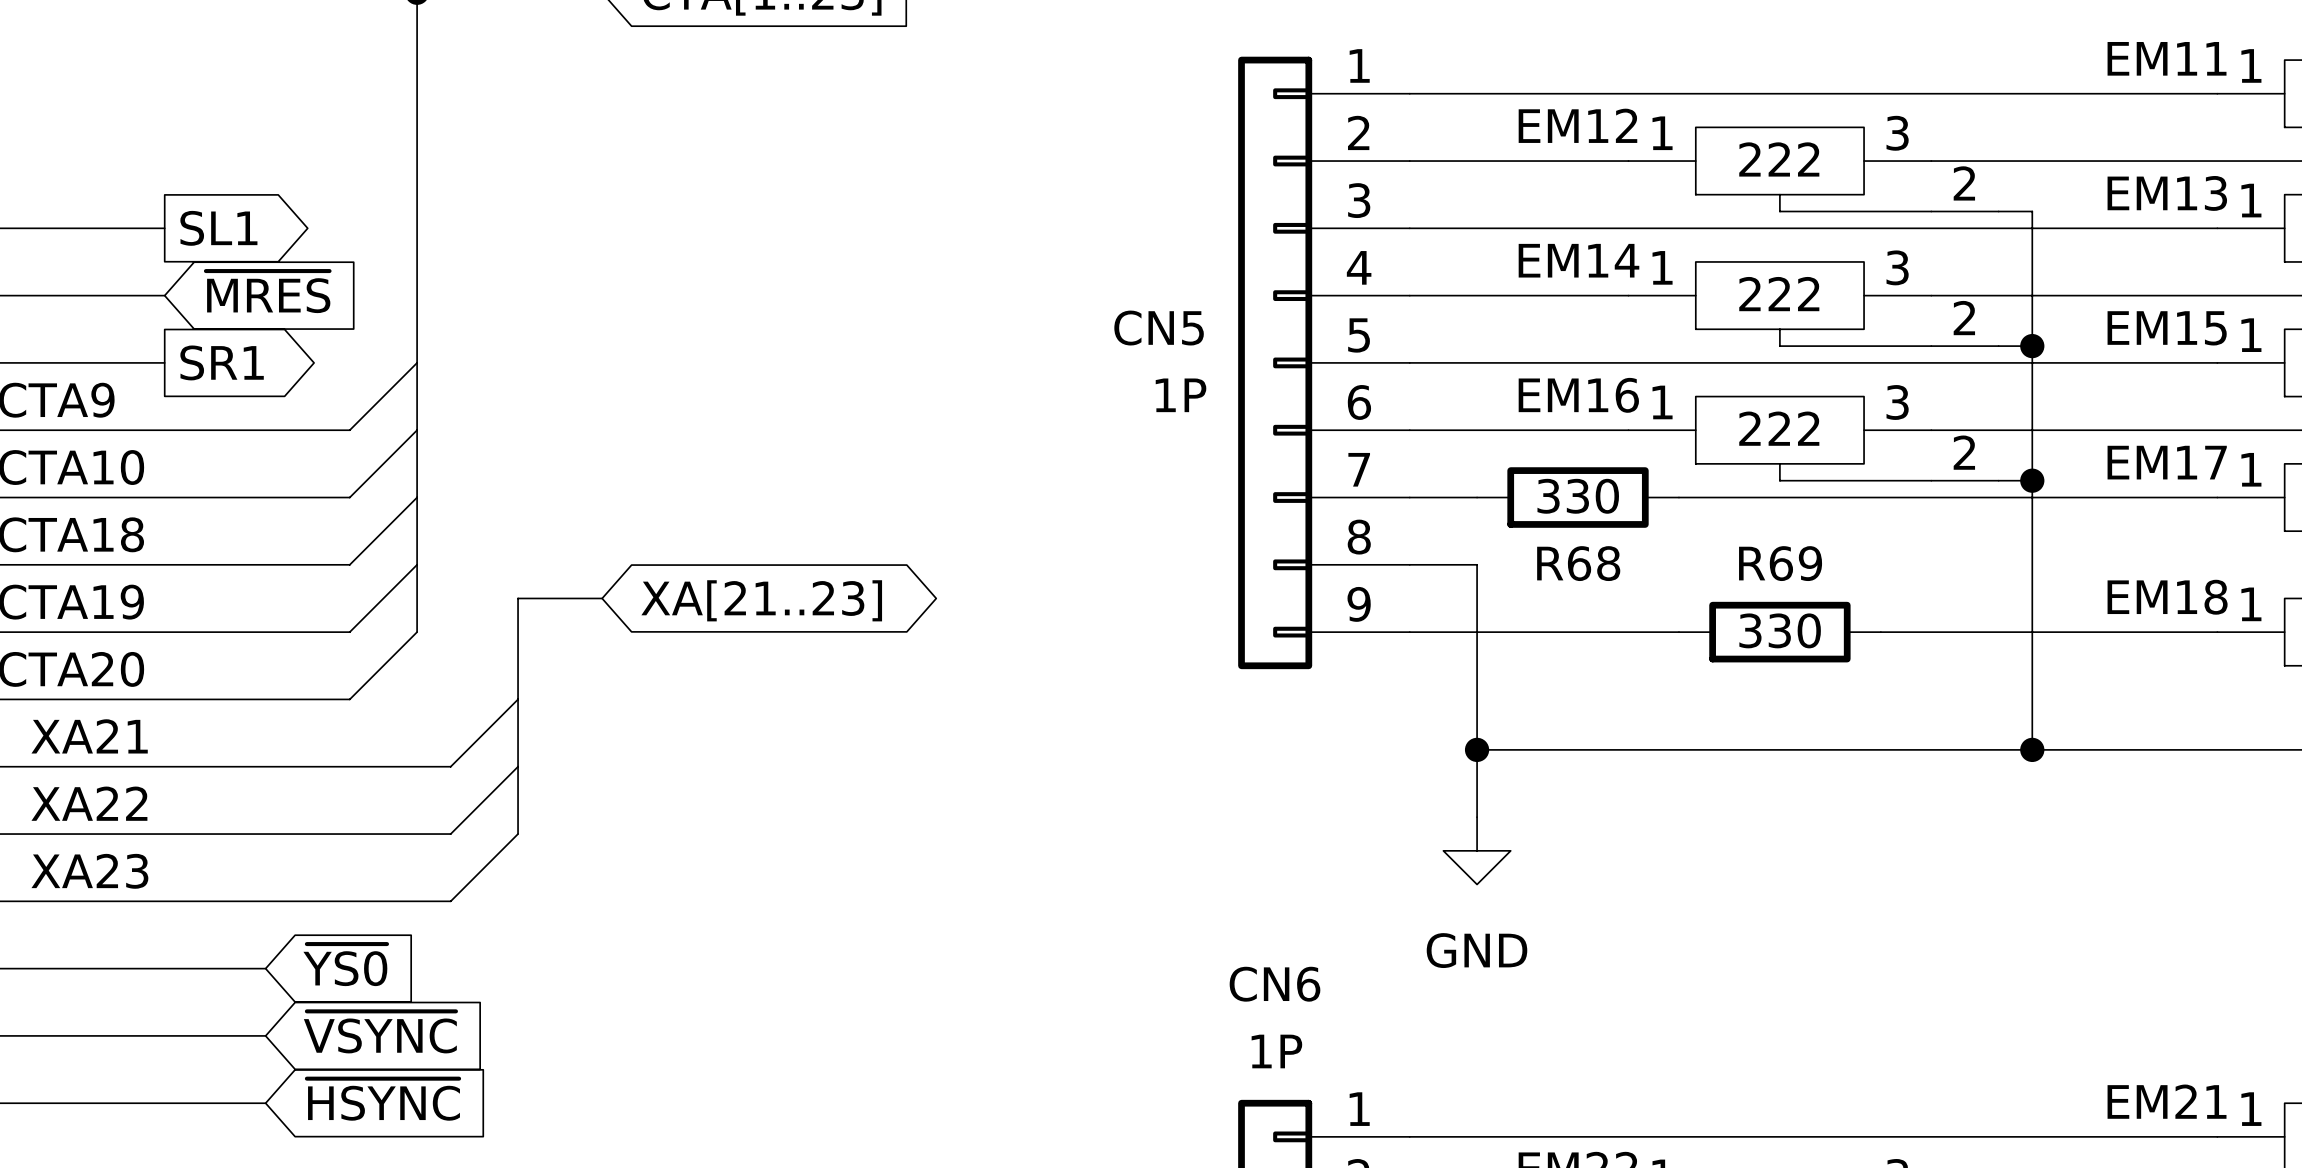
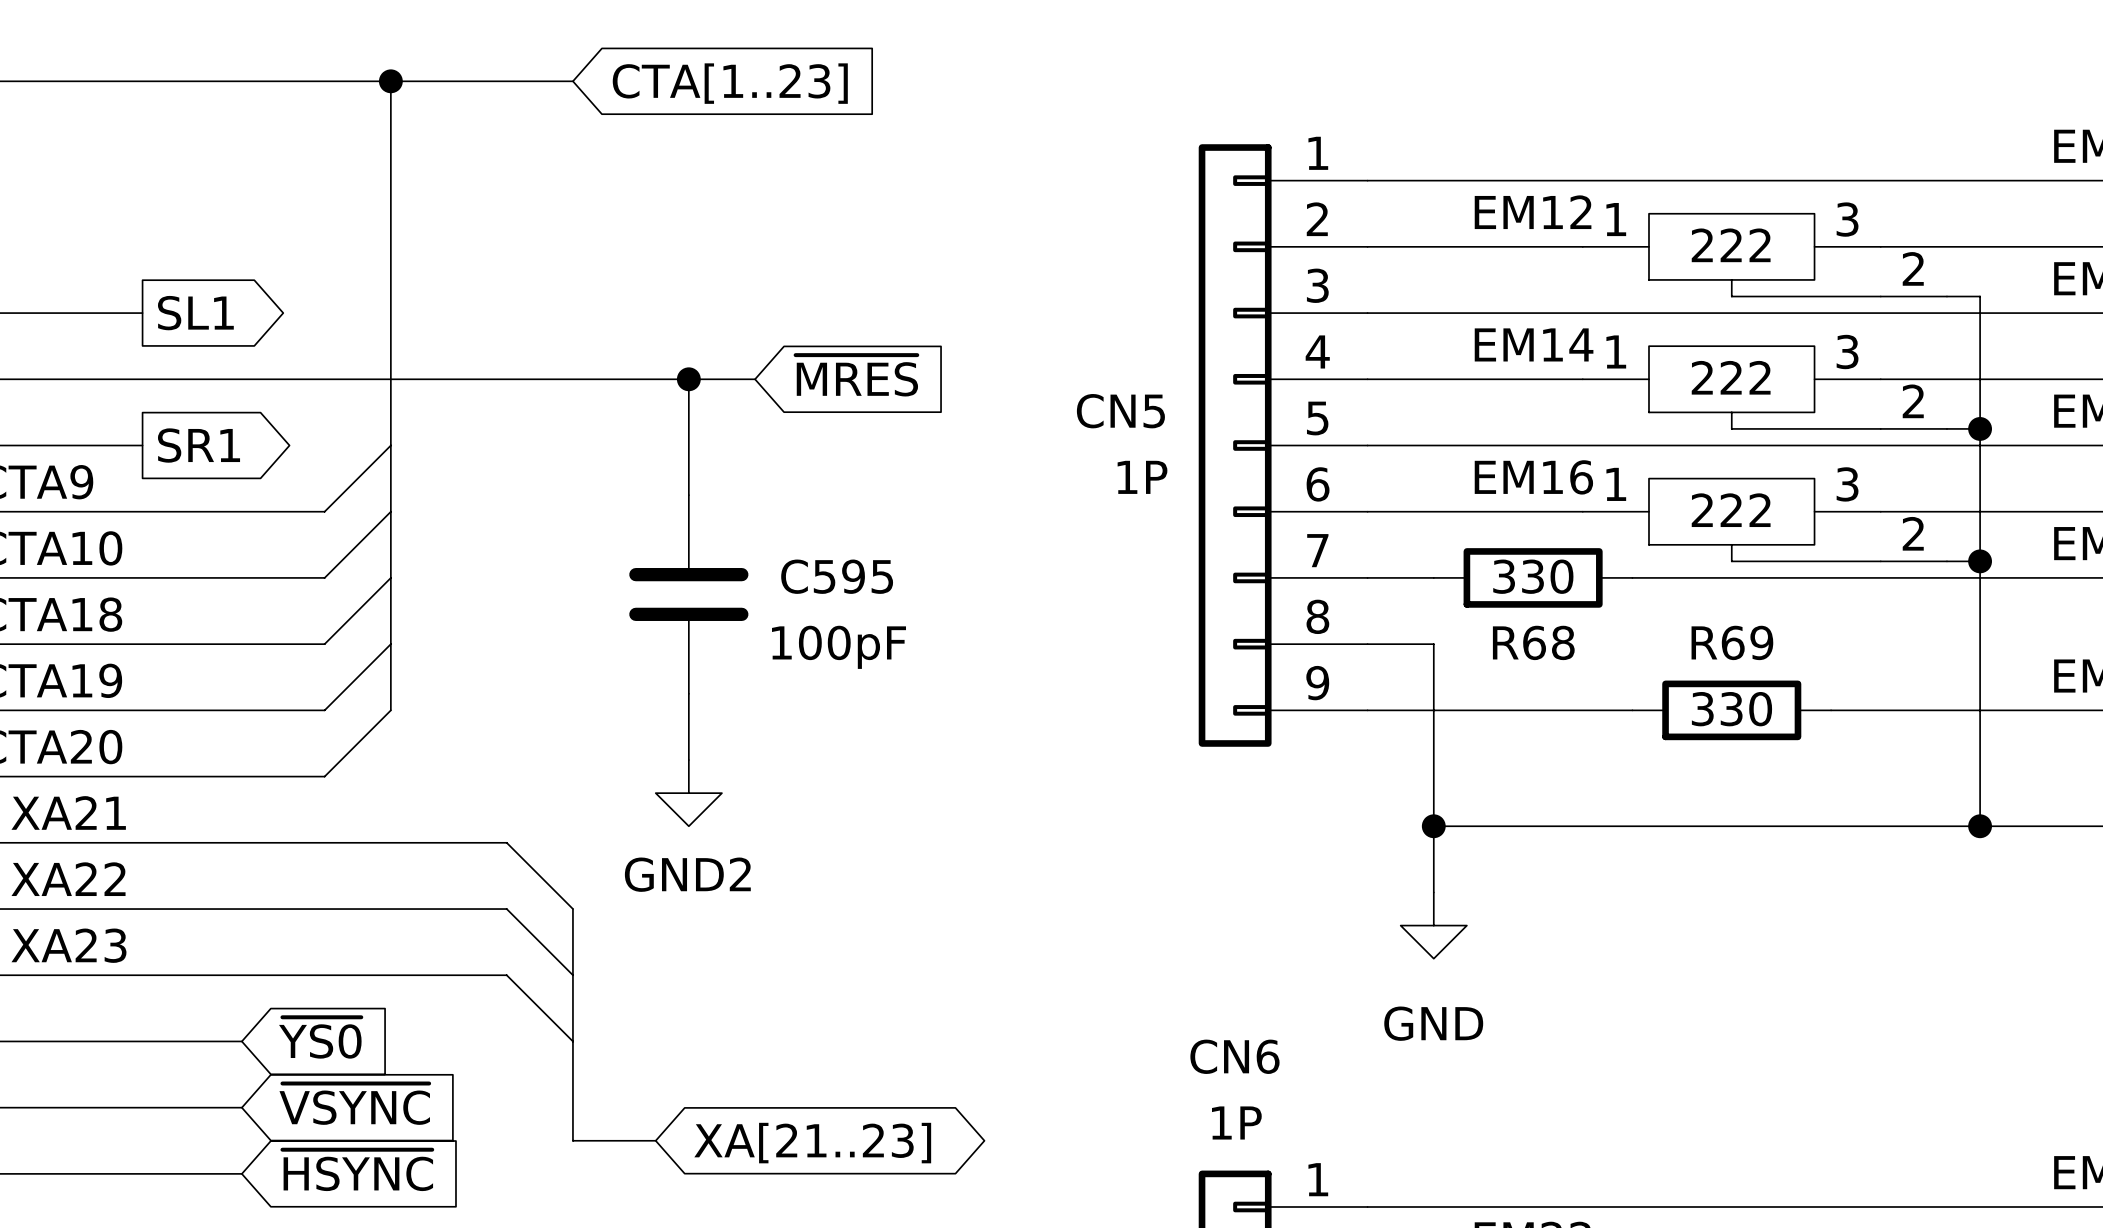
global label position: ~{MRES} (268, 292) -> ~{MRES} (856, 375)
wire: none -> (142, 379) (755, 379)
wire: none -> (688, 379) (688, 495)
junction: none -> (688, 379)
C595: none -> 100pF (688, 594)
bus: (602, 598) (518, 598) (518, 834) -> none
global label position: XA[21..23] (761, 600) -> XA[21..23] (812, 1143)
wire: none -> (688, 693) (688, 760)
wire: (518, 699) (450, 766) -> (572, 909) (506, 842) (423, 842)
power symbol: none -> GND2 (688, 793)
wire: (518, 766) (450, 834) -> (572, 975) (506, 909) (423, 909)
wire: (518, 834) (450, 901) -> (572, 1041) (506, 975) (423, 975)
bus: none -> (572, 909) (572, 1140) (655, 1140)

